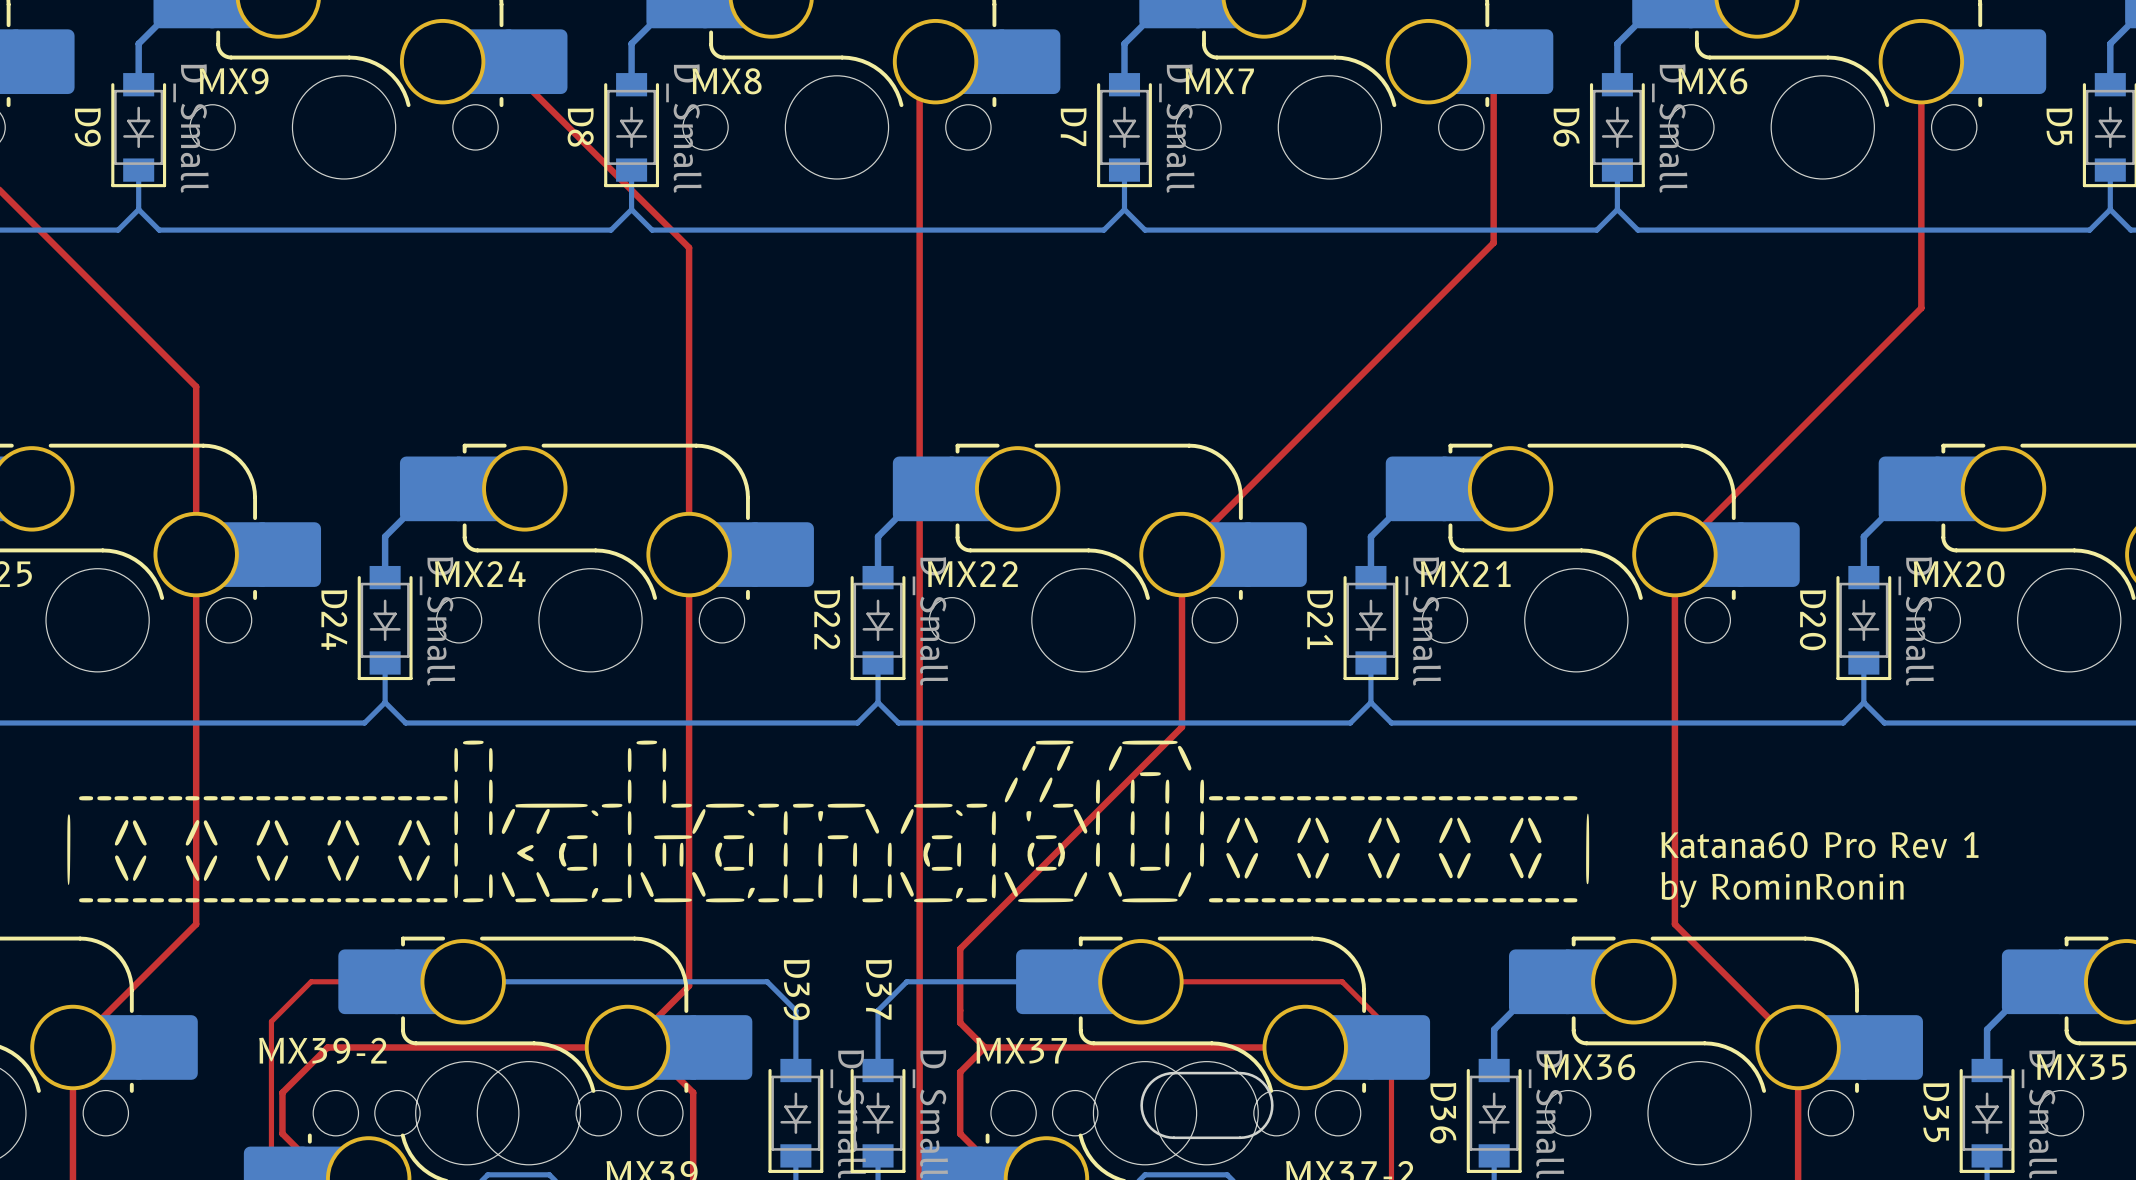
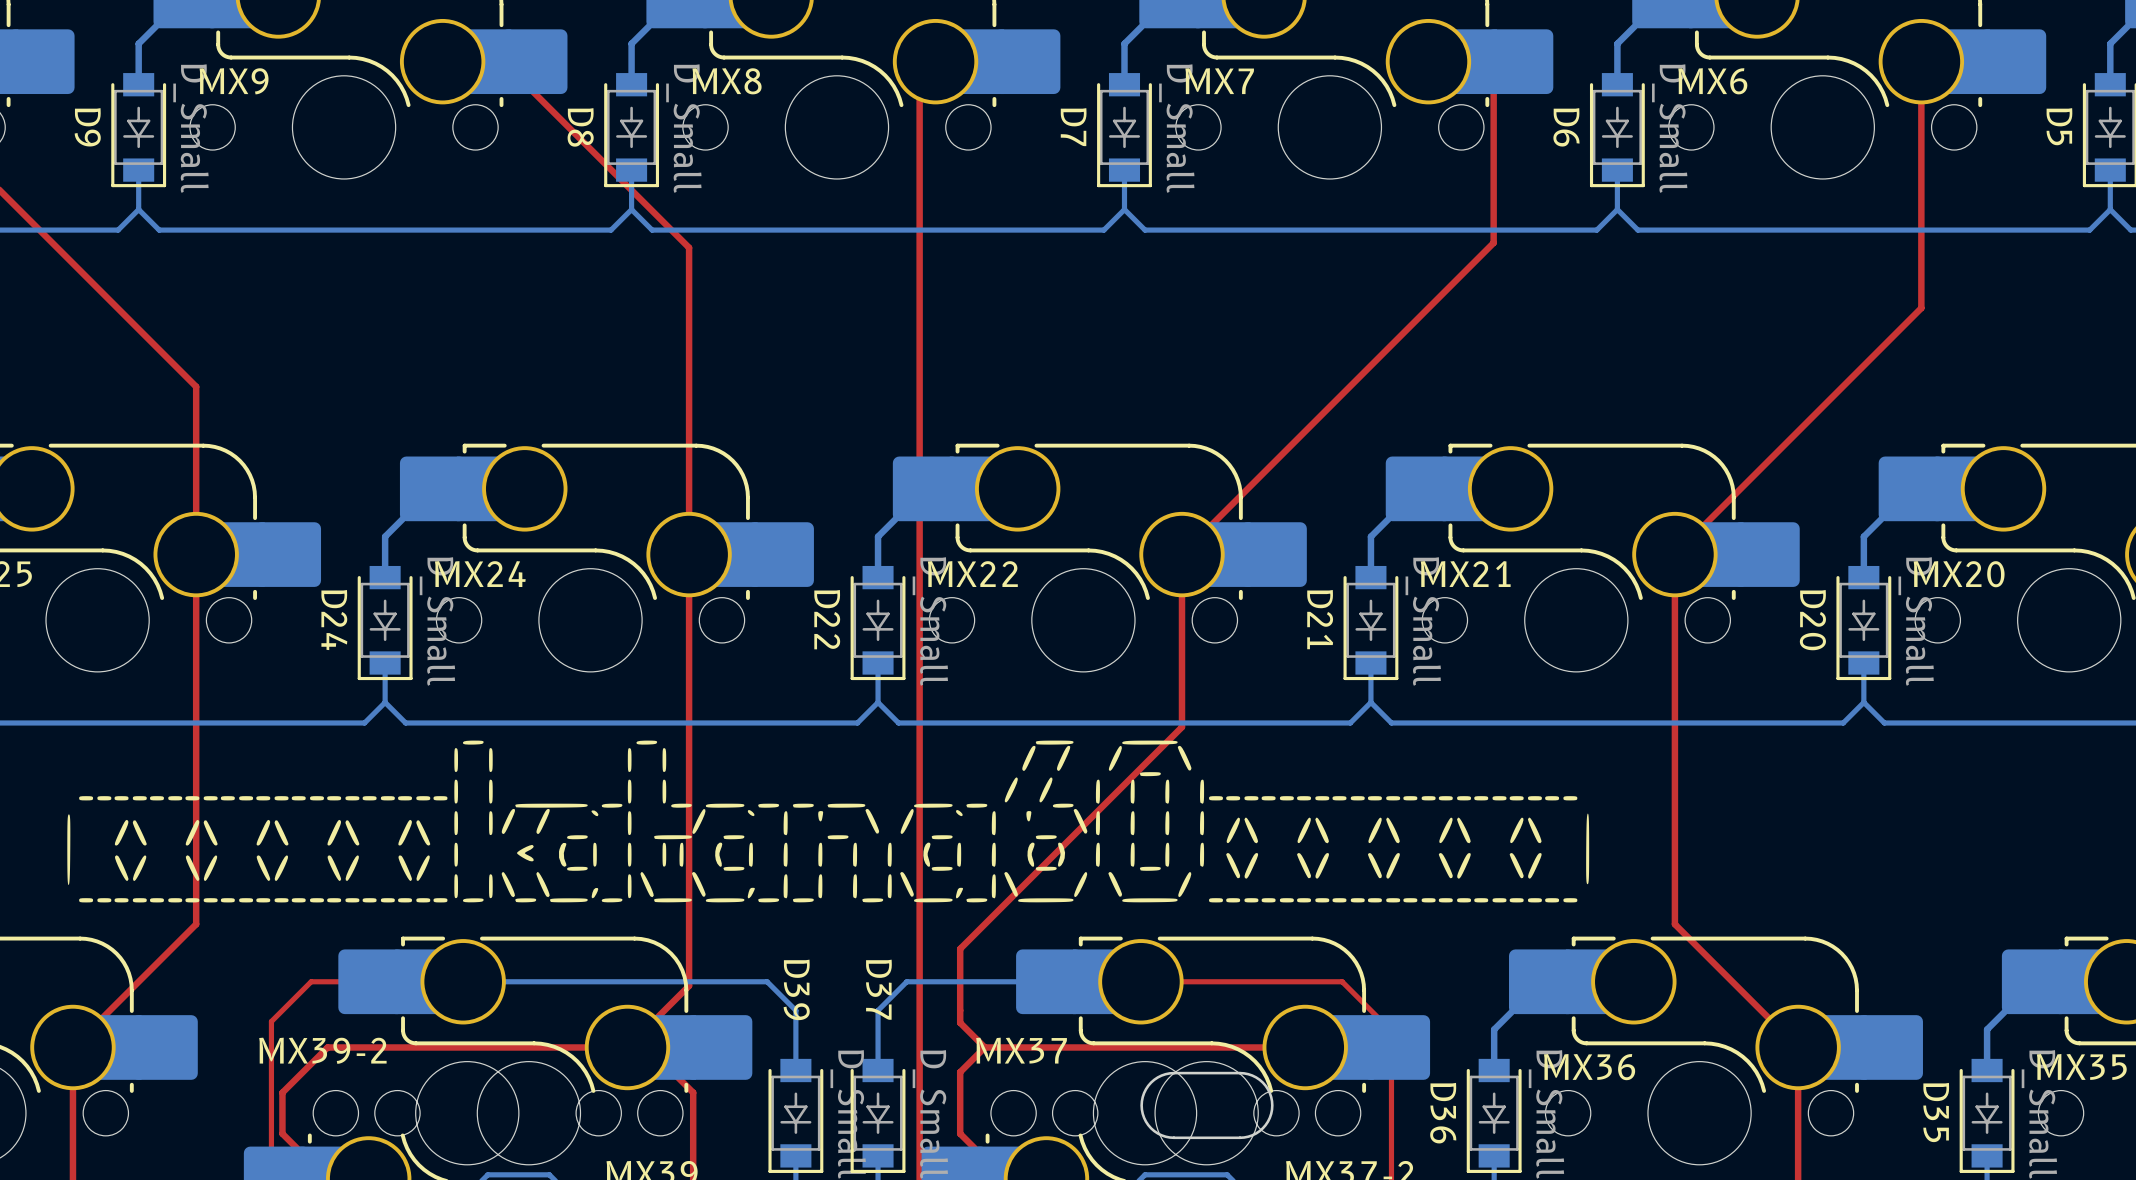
text: Katana60 Pro Rev 1 (1819, 845) -> none
text: by RominRonin (1782, 889) -> none

